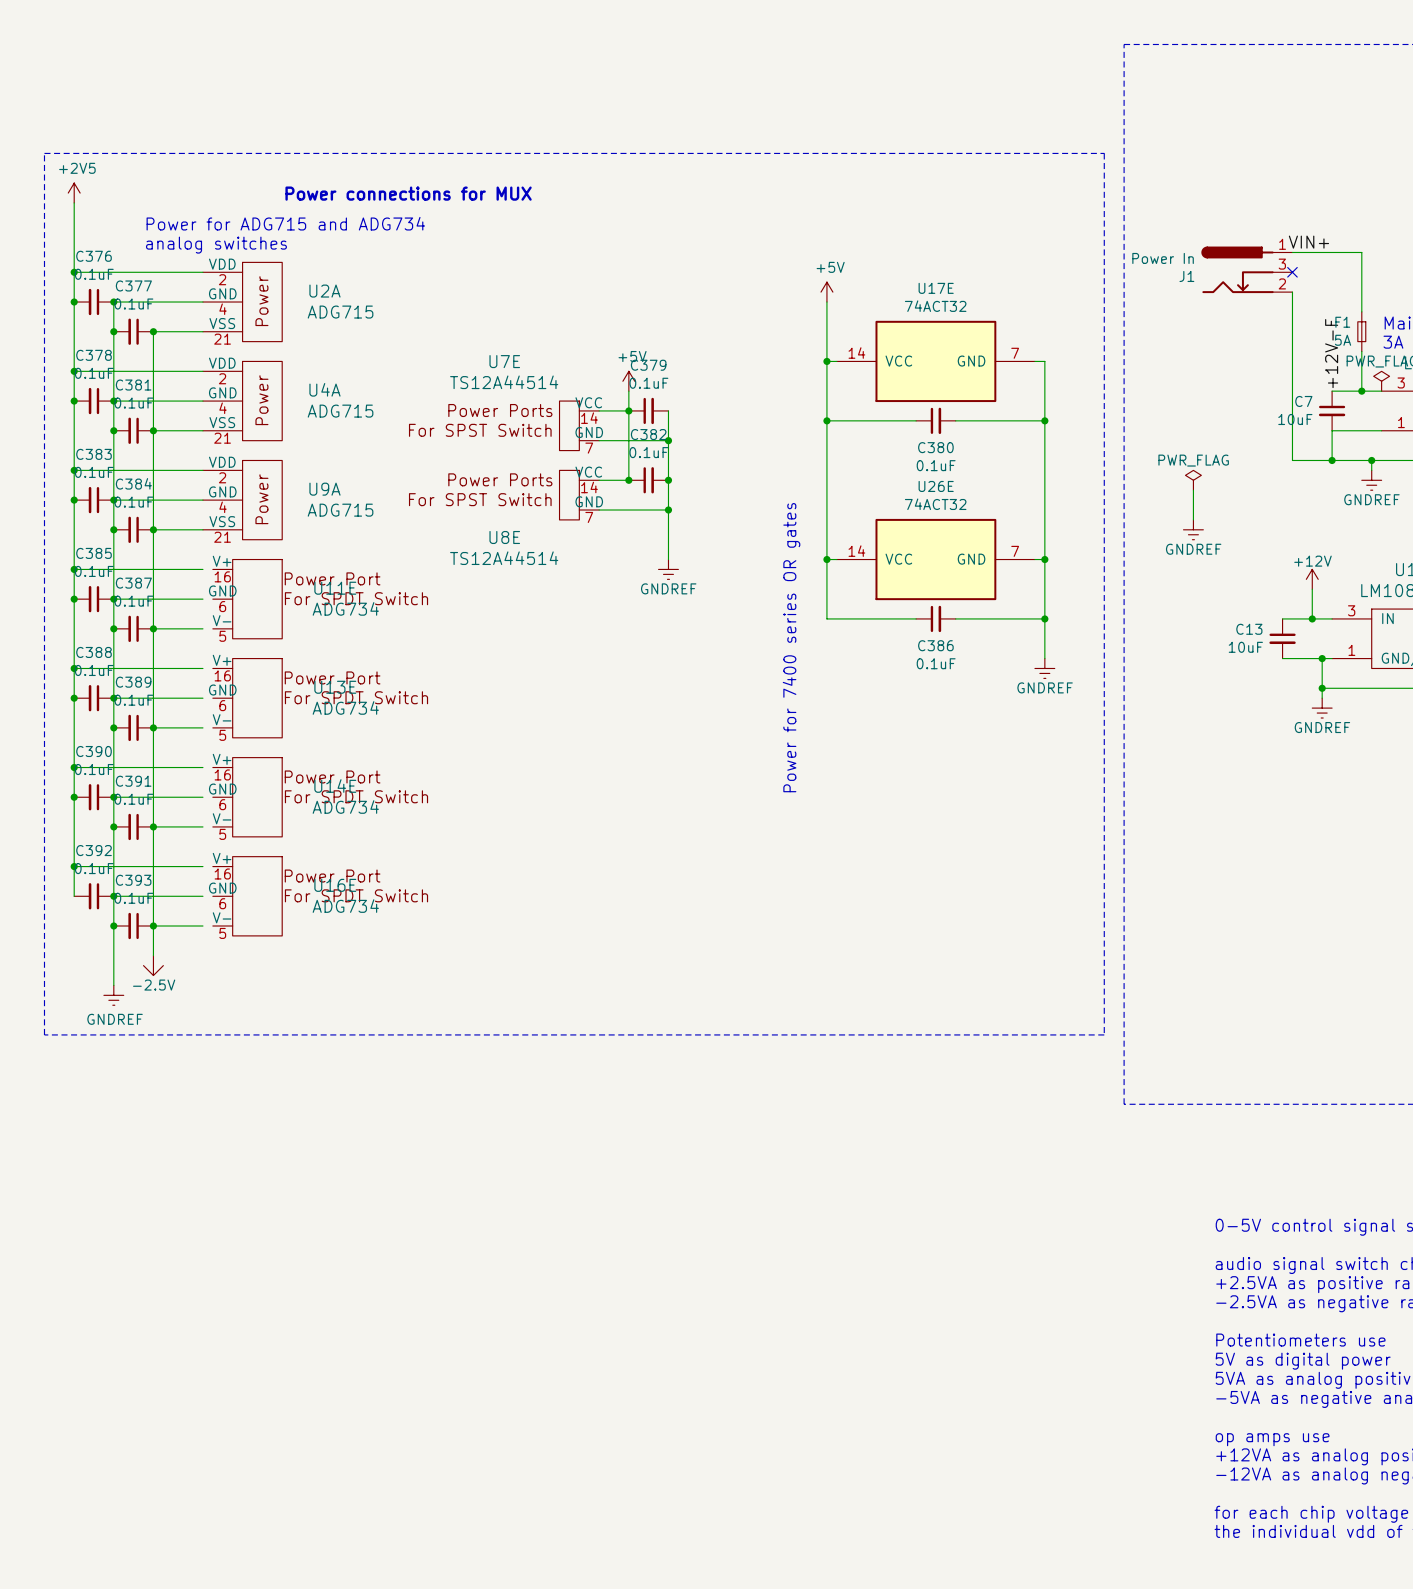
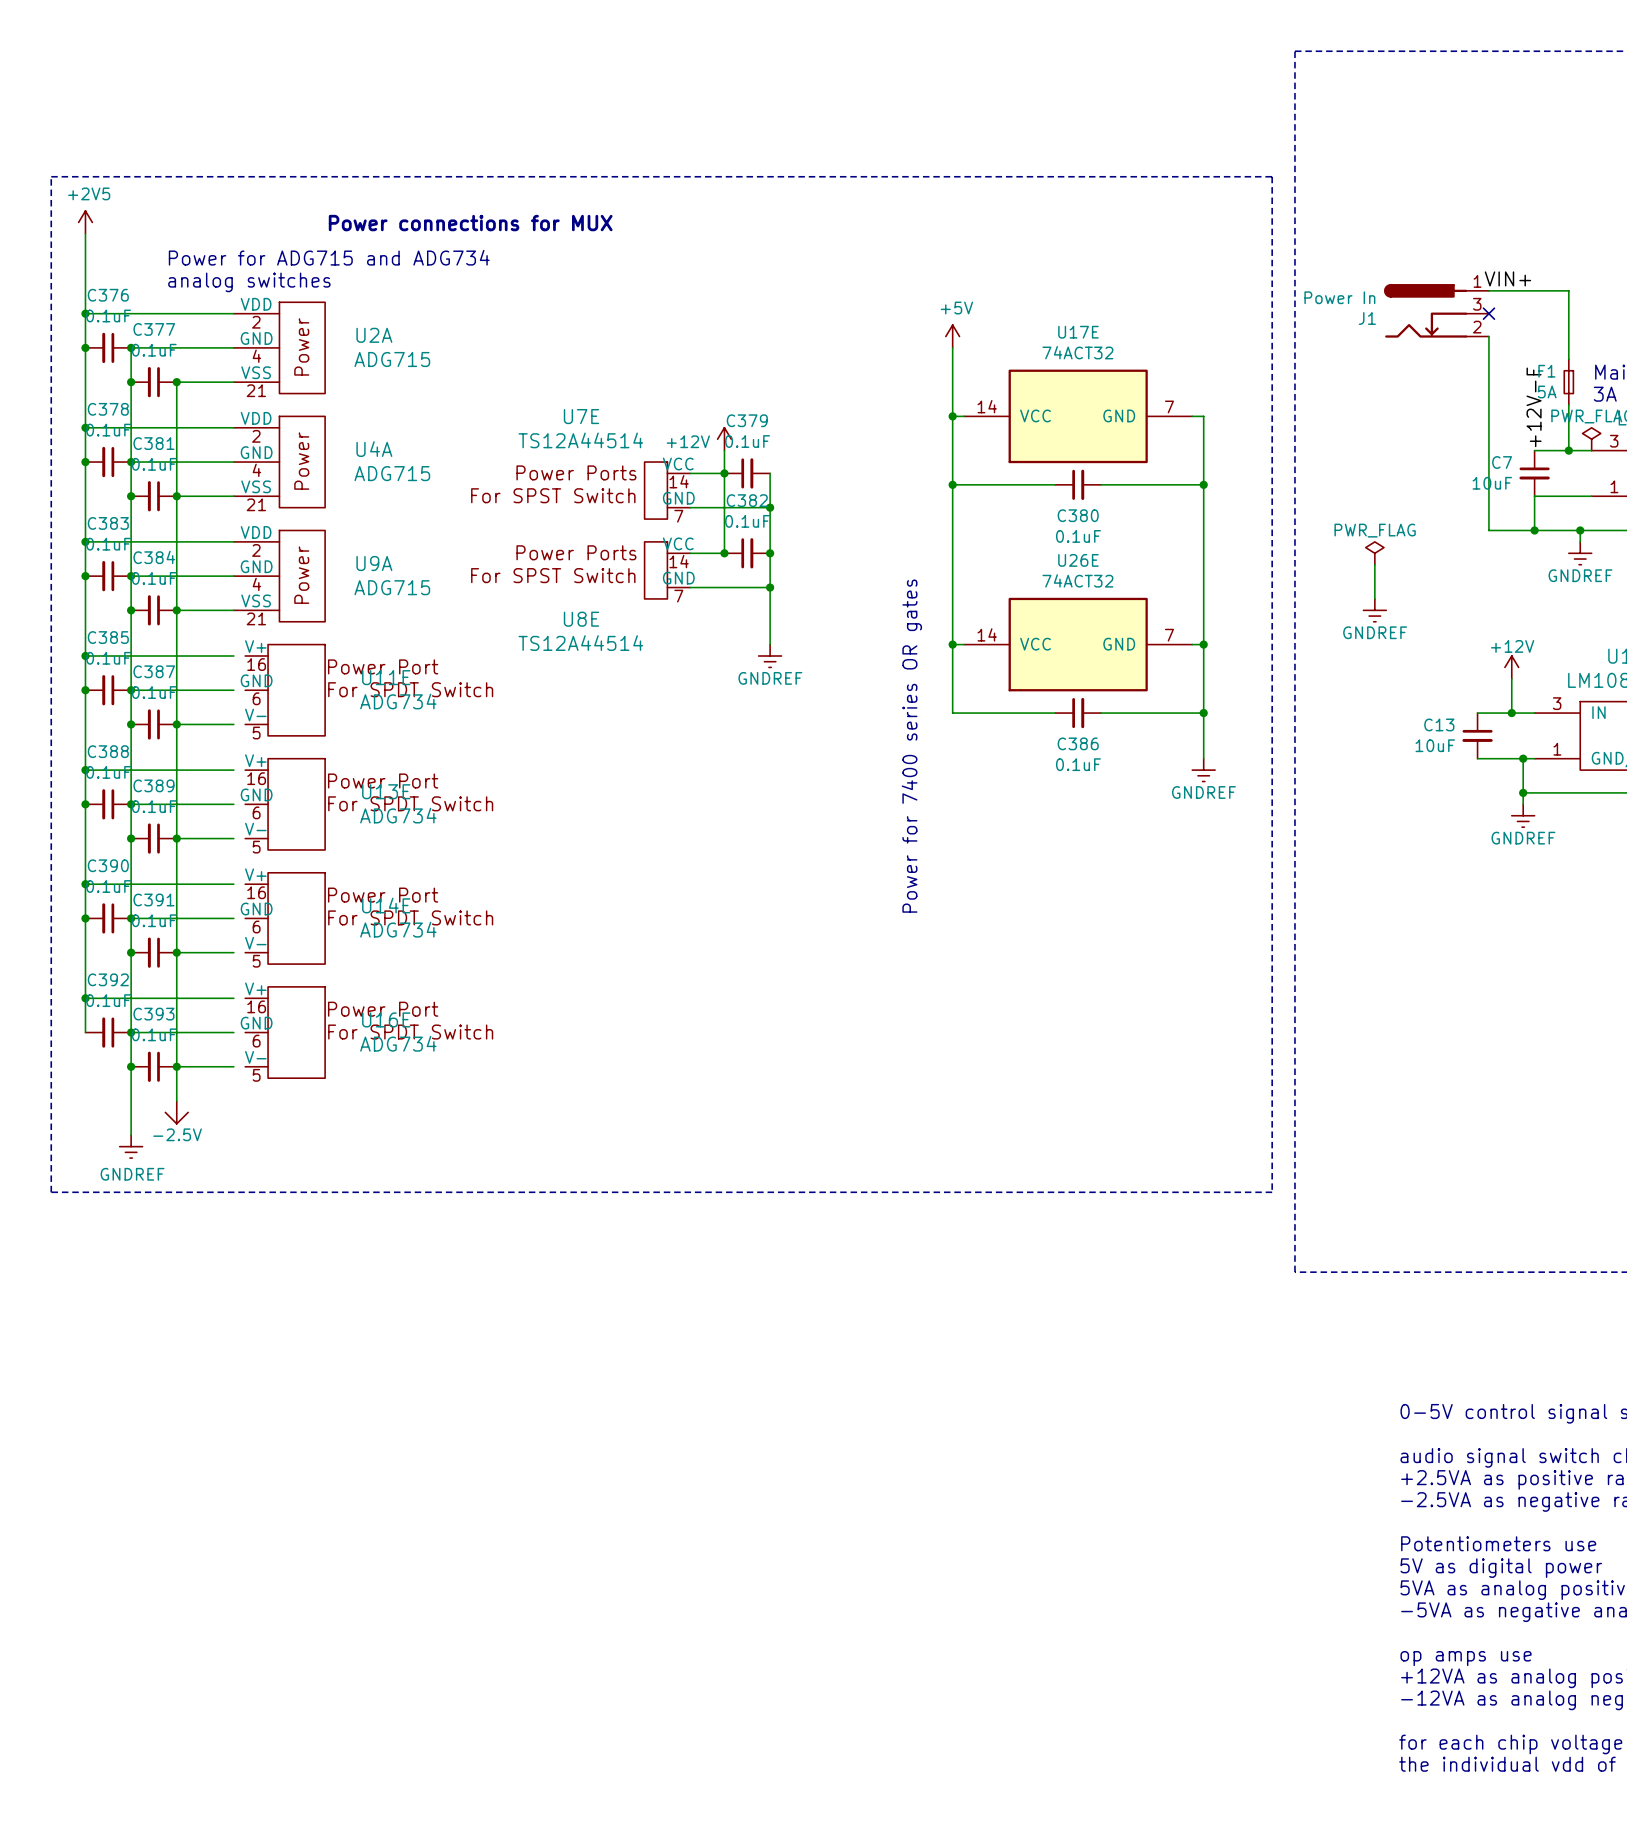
power symbol: +5V (628, 381) -> +12V (724, 439)

